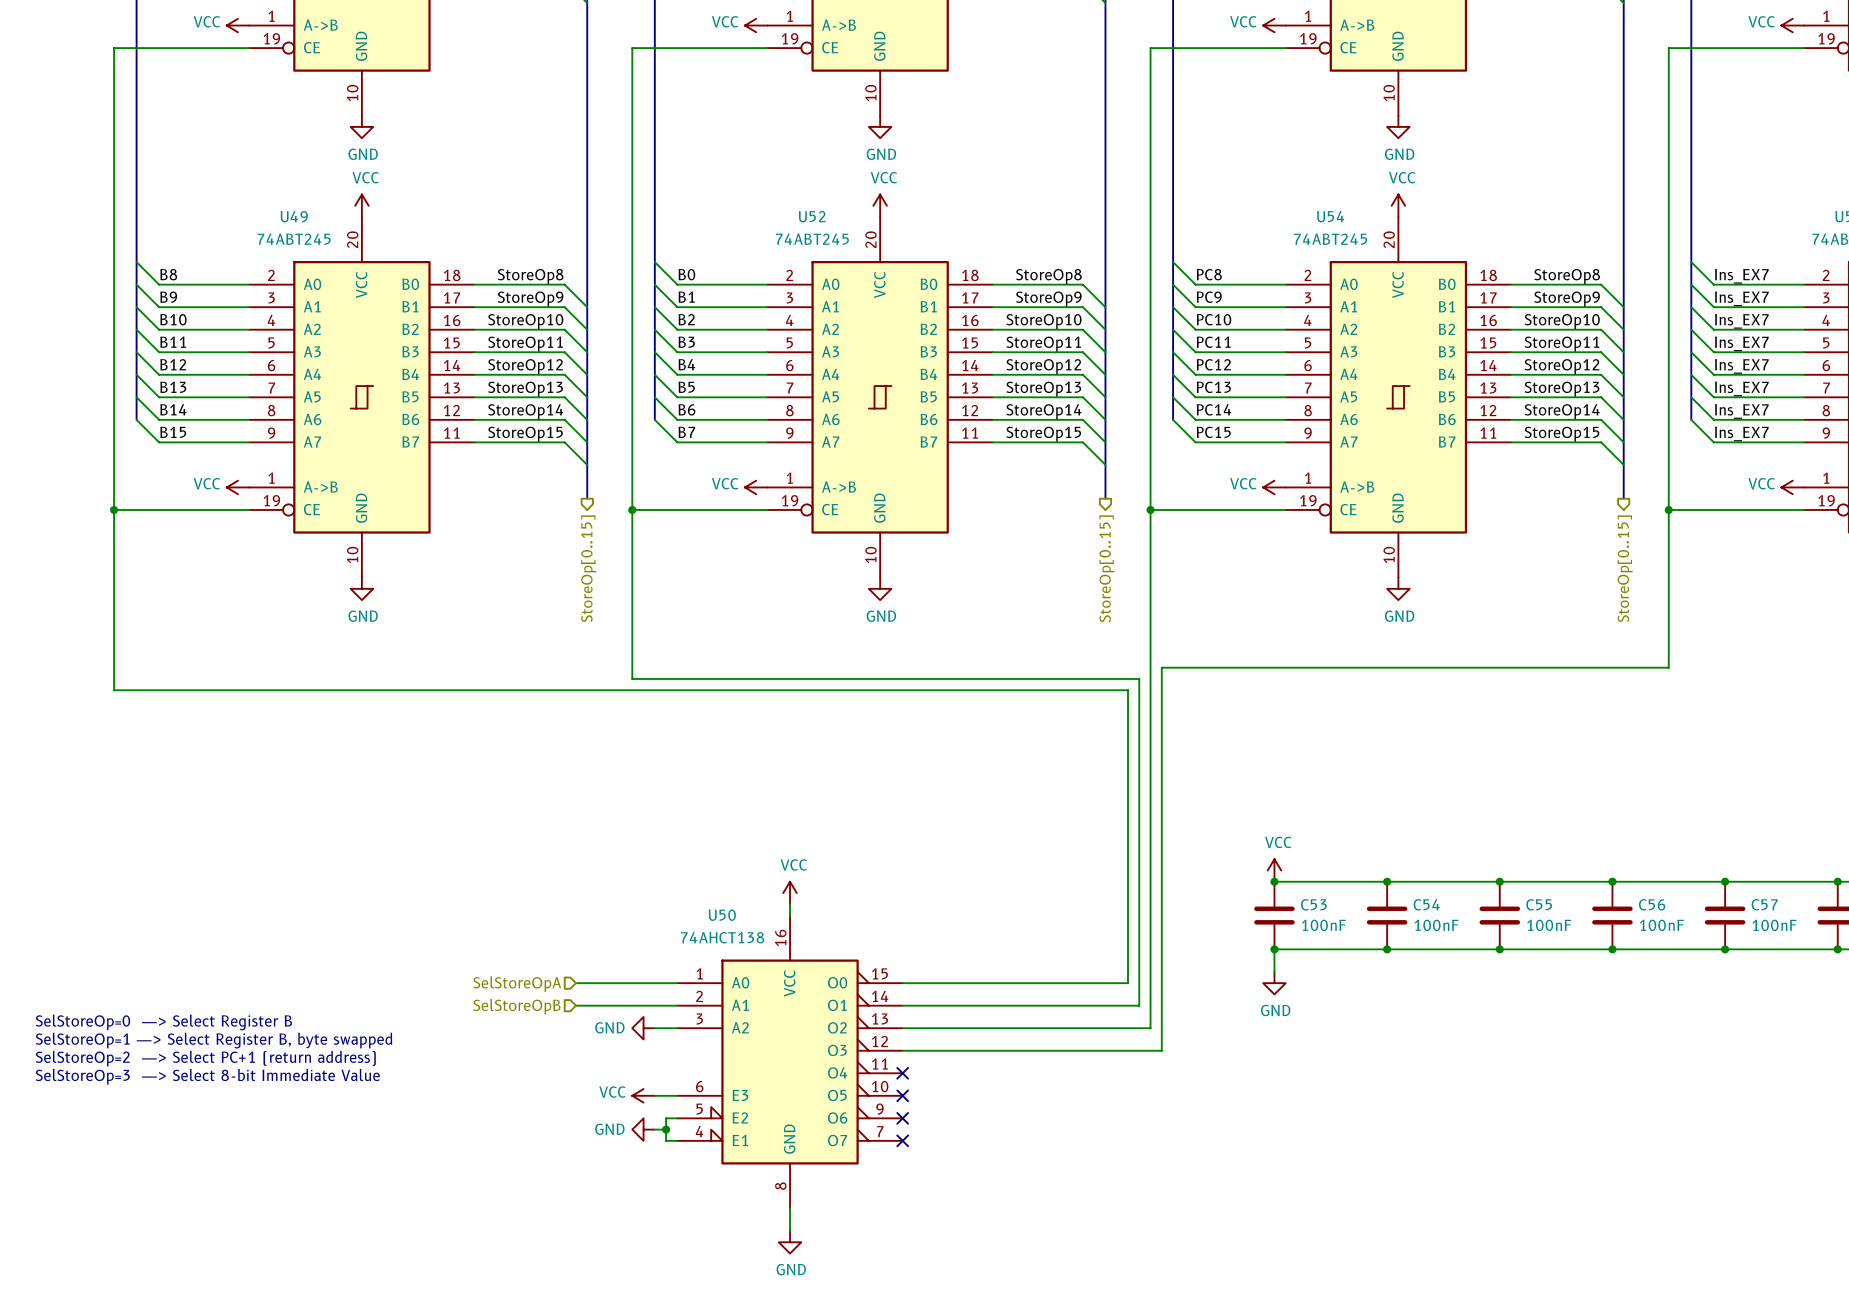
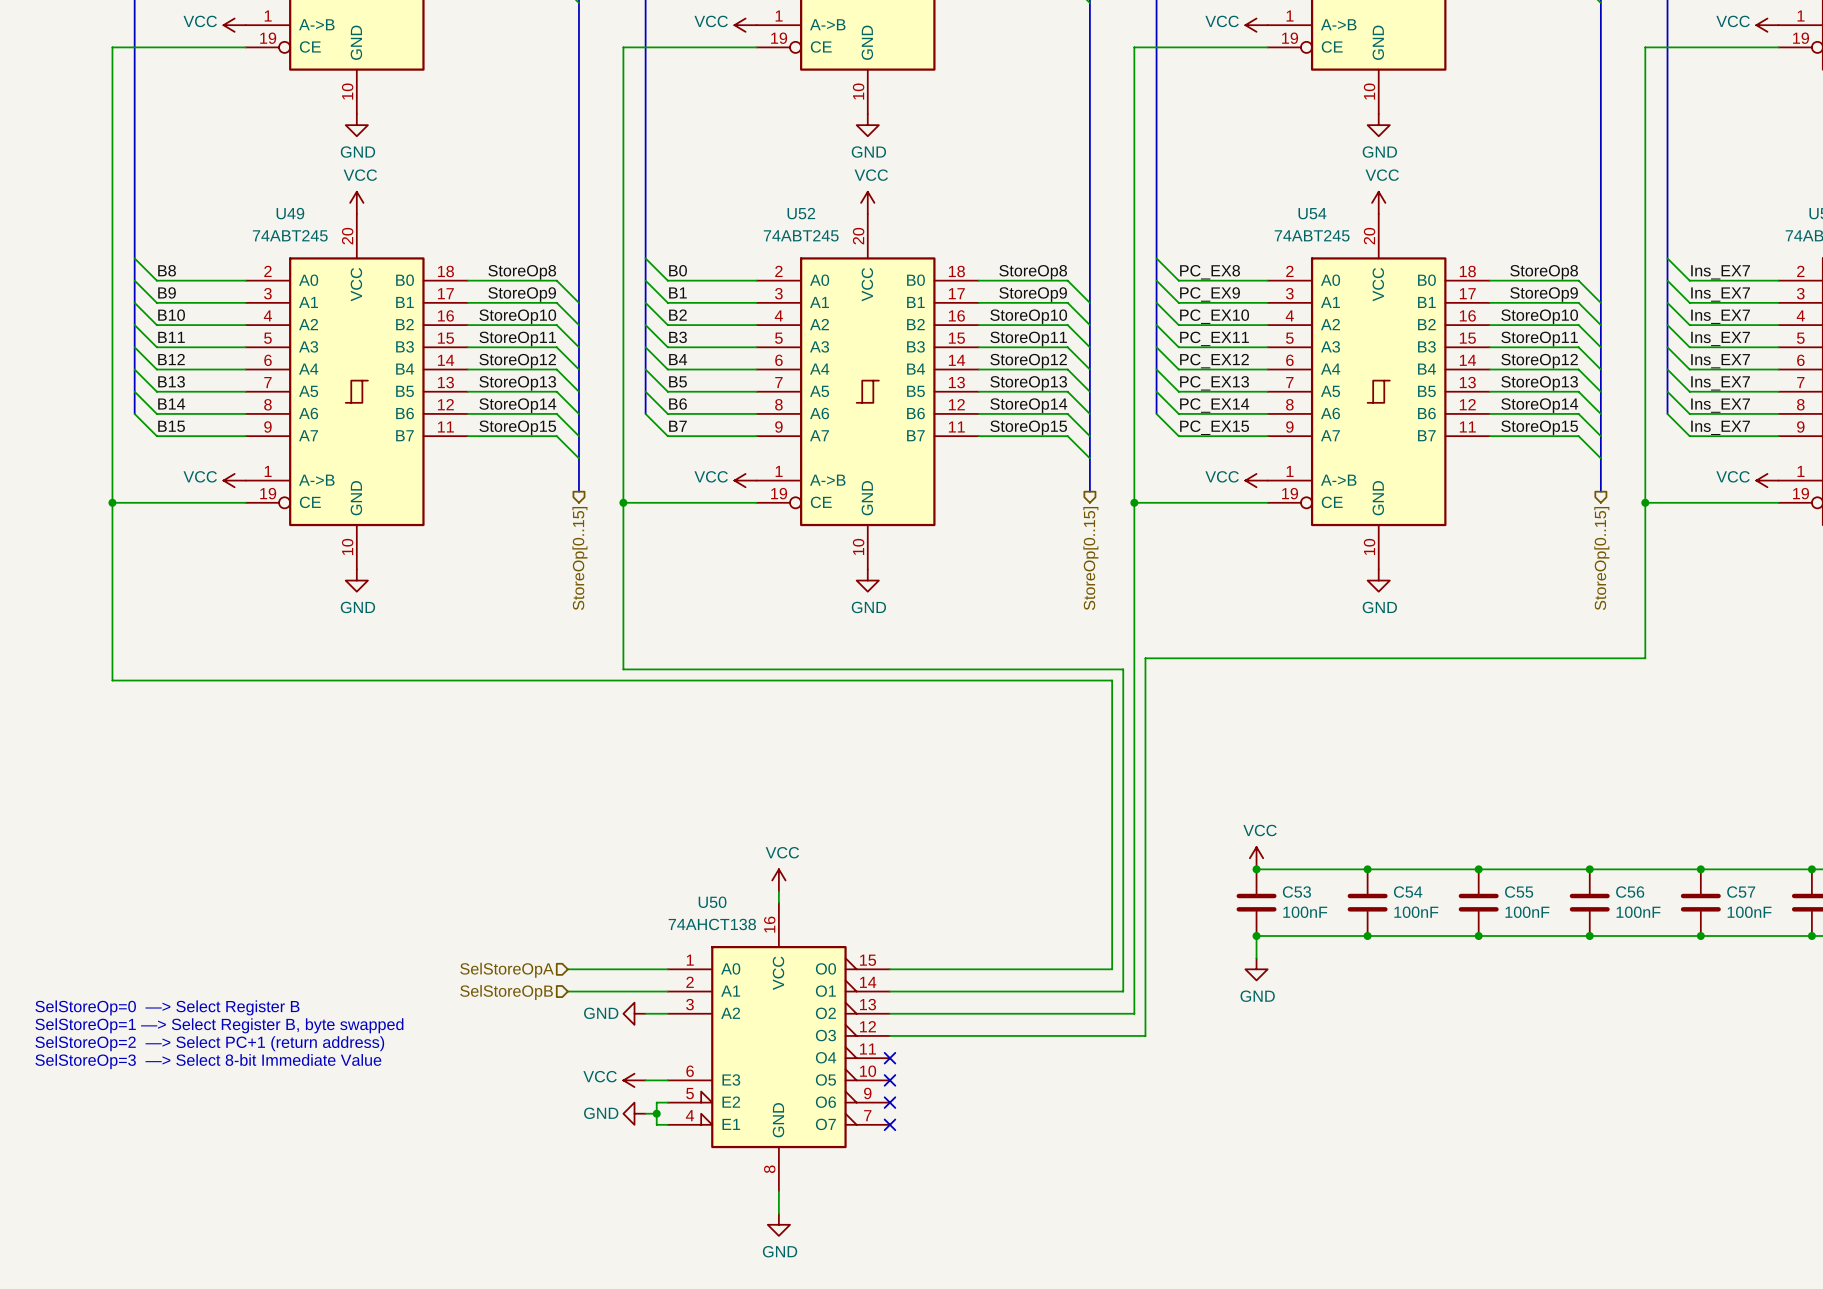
label: PC8 (1209, 274) -> PC_EX8 (1210, 272)
label: PC9 (1209, 297) -> PC_EX9 (1210, 294)
label: PC10 (1214, 319) -> PC_EX10 (1214, 316)
label: PC11 (1213, 342) -> PC_EX11 (1214, 338)
label: PC12 (1213, 364) -> PC_EX12 (1214, 361)
label: PC13 (1213, 387) -> PC_EX13 (1214, 383)
label: PC14 (1213, 409) -> PC_EX14 (1214, 405)
label: PC15 (1213, 432) -> PC_EX15 (1214, 427)

